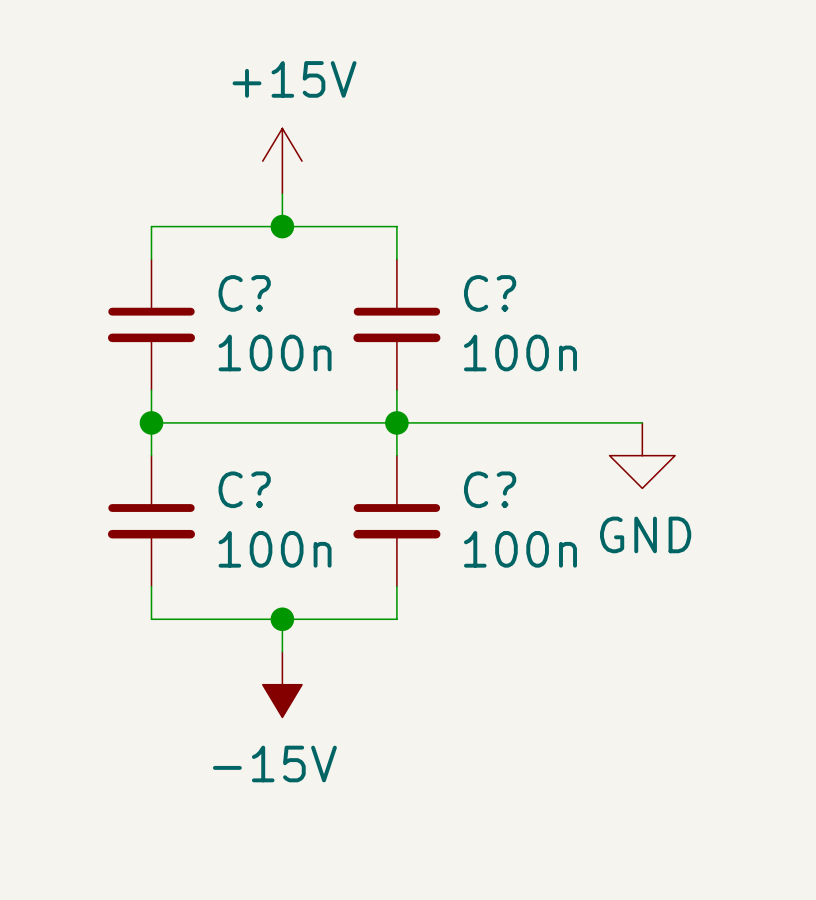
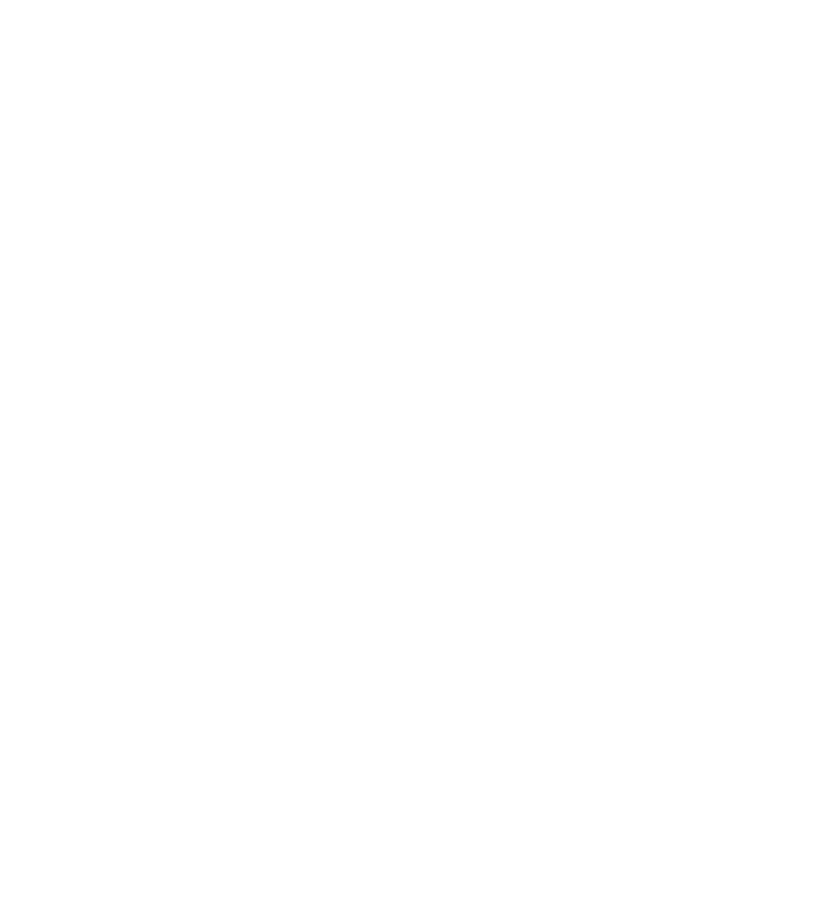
power symbol: +15V (282, 161) -> none
wire: (282, 193) (282, 226) -> none
junction: (282, 226) -> none
wire: (151, 259) (151, 226) (396, 226) (396, 259) -> none
C?: 100n (151, 324) -> none
C?: 100n (396, 324) -> none
wire: (151, 390) (151, 455) -> none
wire: (396, 390) (396, 455) -> none
wire: (151, 422) (642, 422) -> none
junction: (151, 422) -> none
junction: (396, 422) -> none
power symbol: GND (642, 455) -> none
C?: 100n (151, 521) -> none
C?: 100n (396, 521) -> none
wire: (151, 586) (151, 619) (396, 619) (396, 586) -> none
wire: (282, 619) (282, 652) -> none
junction: (282, 619) -> none
power symbol: -15V (282, 684) -> none

